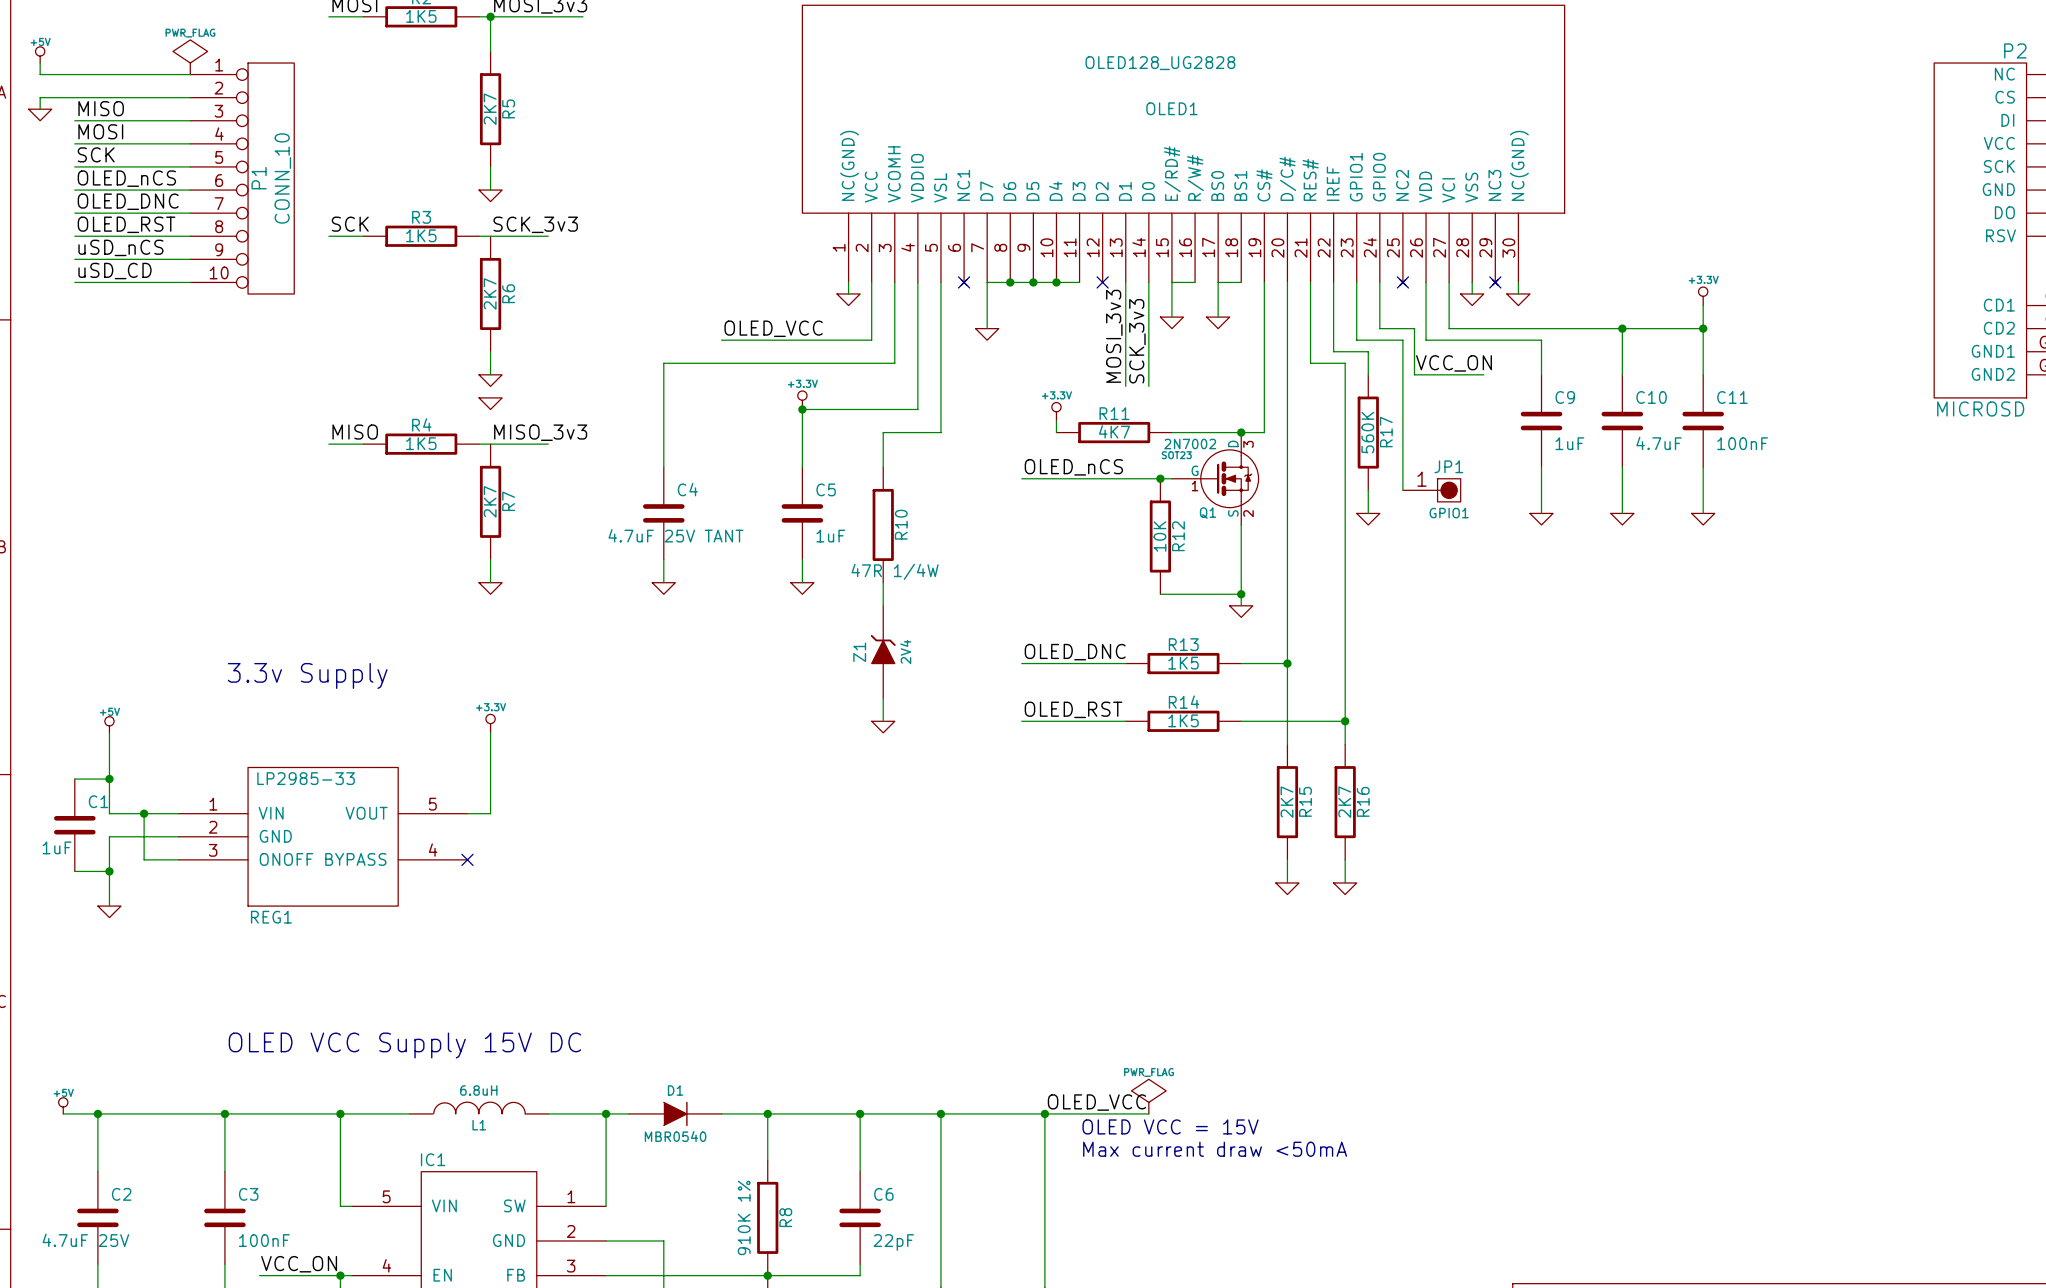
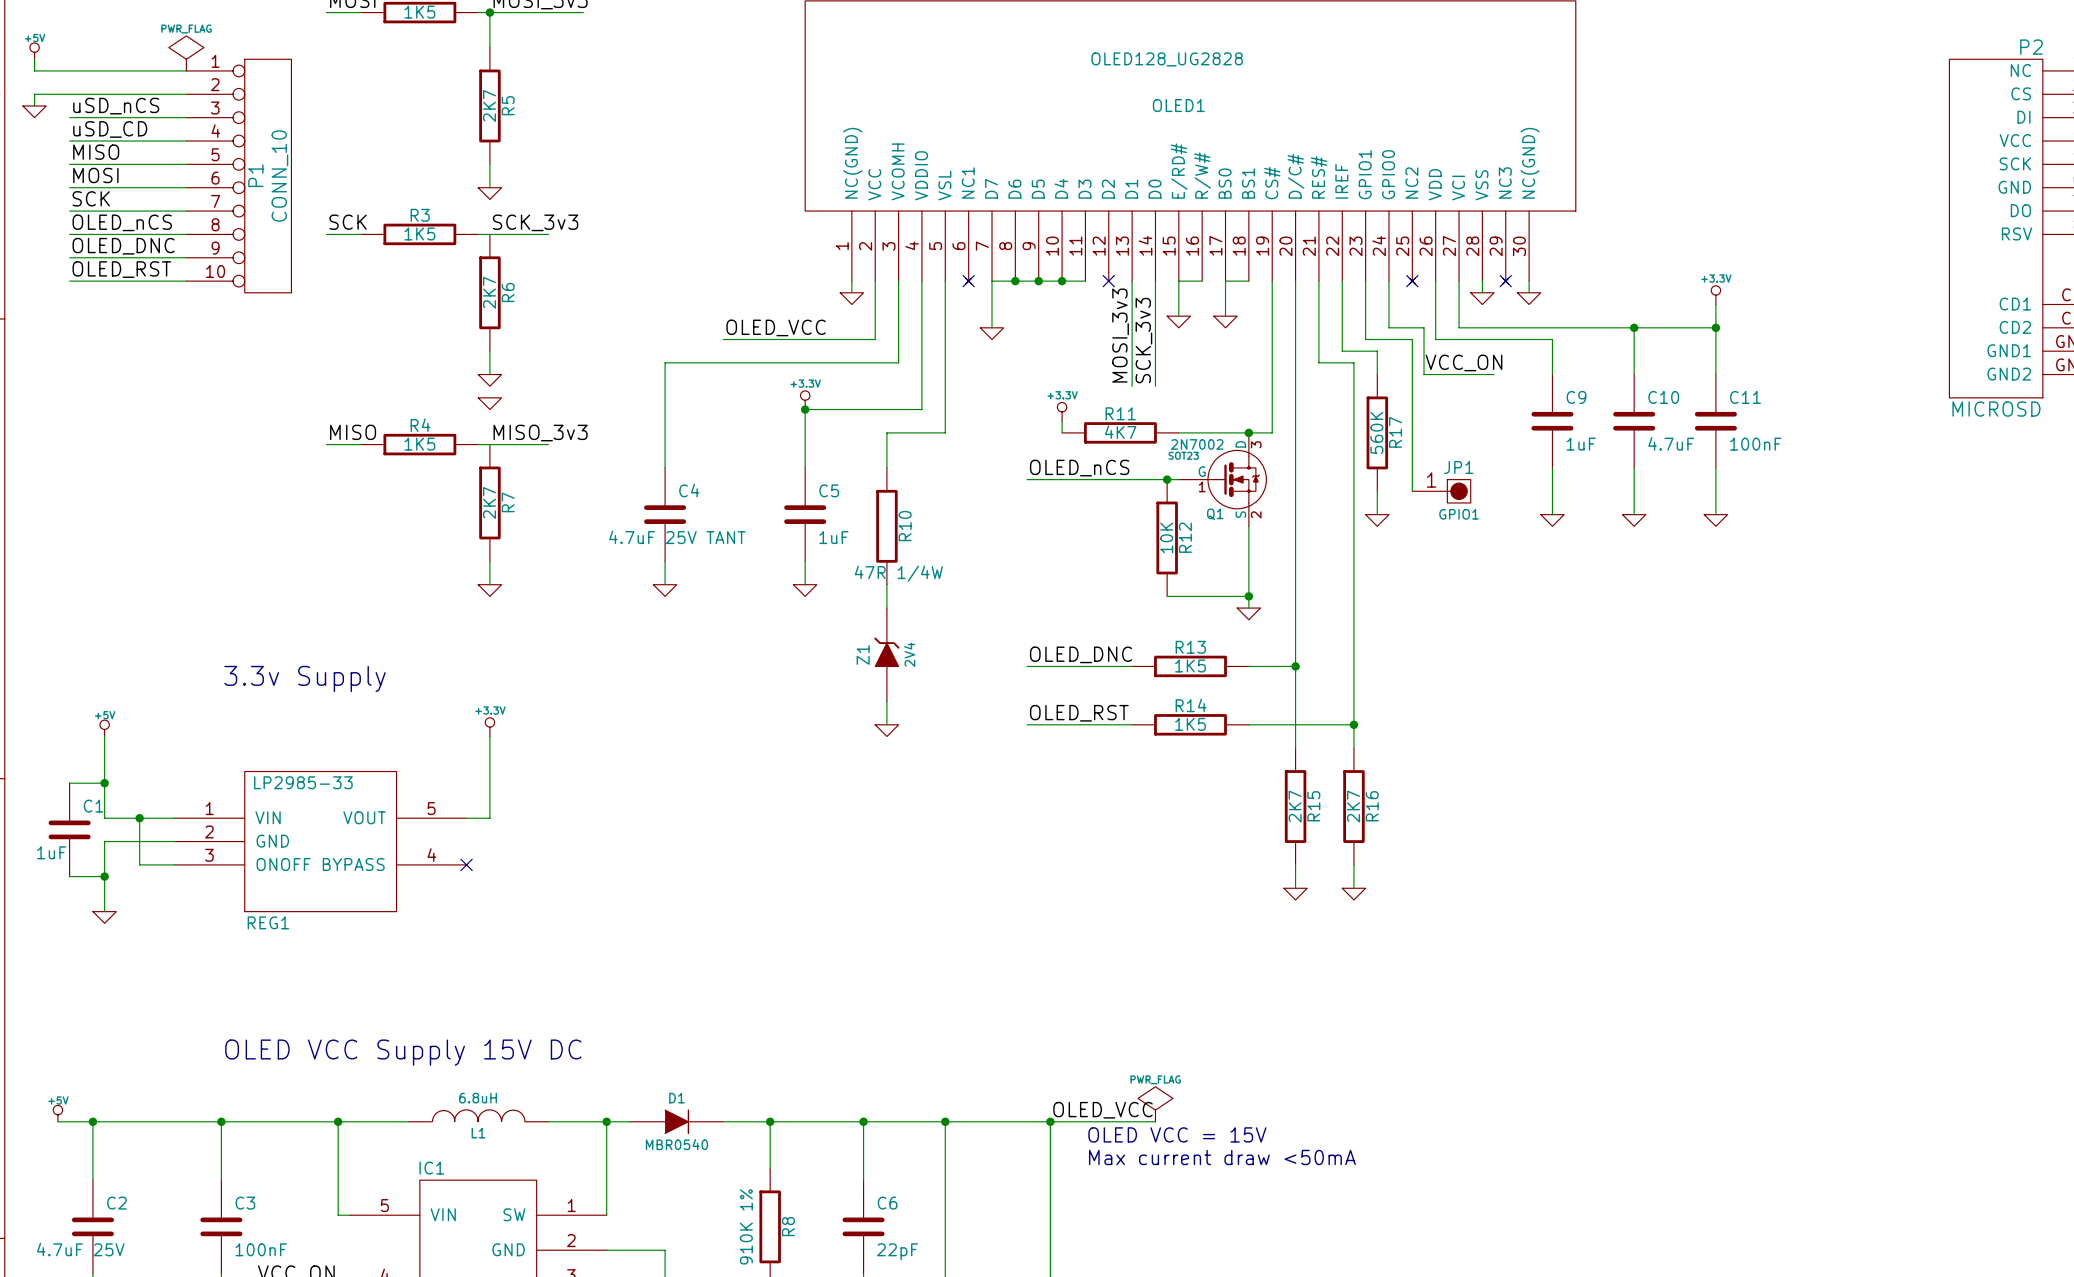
label: MISO (101, 108) -> uSD_nCS (116, 106)
label: MOSI (100, 131) -> uSD_CD (110, 129)
label: SCK (96, 154) -> MISO (96, 152)
label: OLED_nCS (126, 178) -> MOSI (95, 175)
label: OLED_DNC (128, 201) -> SCK (91, 198)
label: OLED_RST (126, 224) -> OLED_nCS (122, 222)
label: uSD_nCS (120, 247) -> OLED_DNC (123, 246)
label: uSD_CD (114, 271) -> OLED_RST (121, 269)

